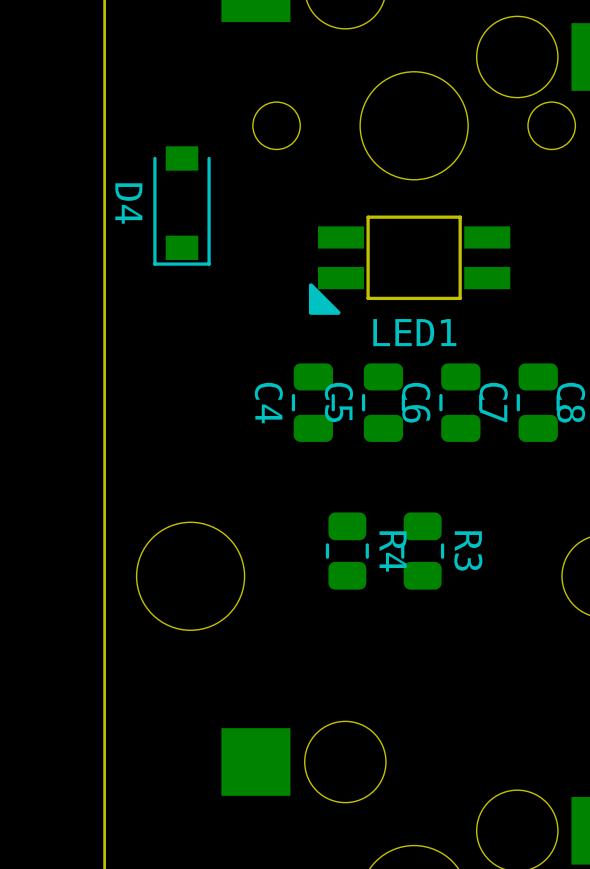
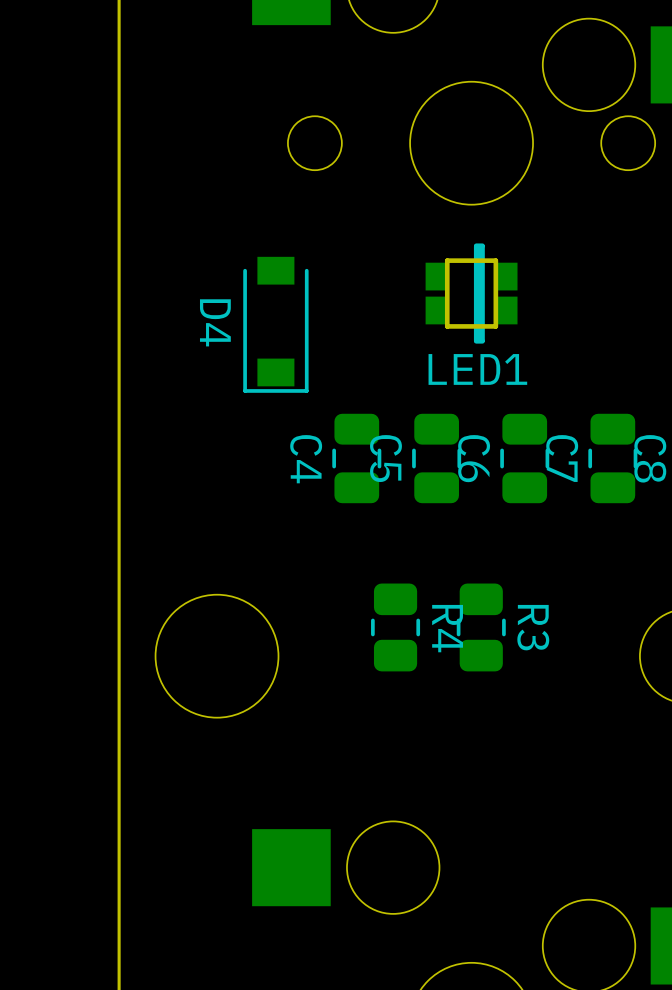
D4 position: (181, 206) -> (275, 324)
LED1 footprint: [308, 215, 511, 315] -> [425, 243, 518, 344]

